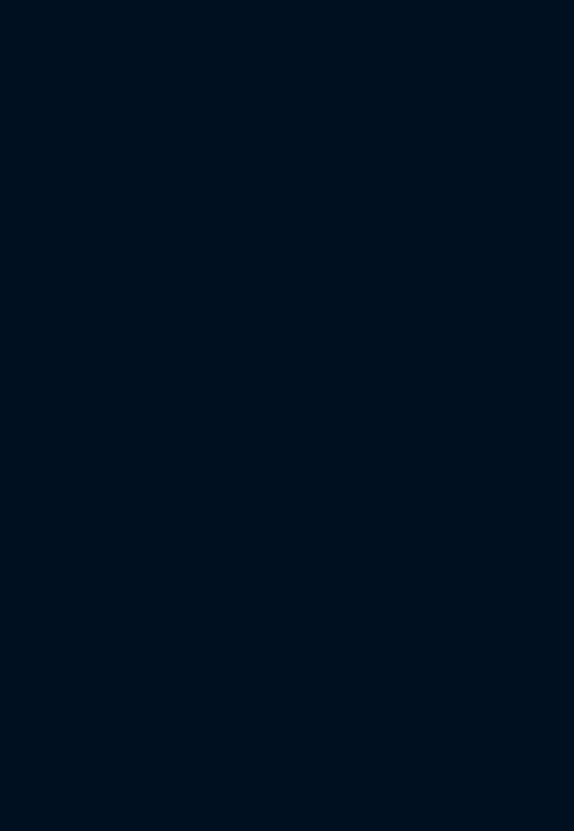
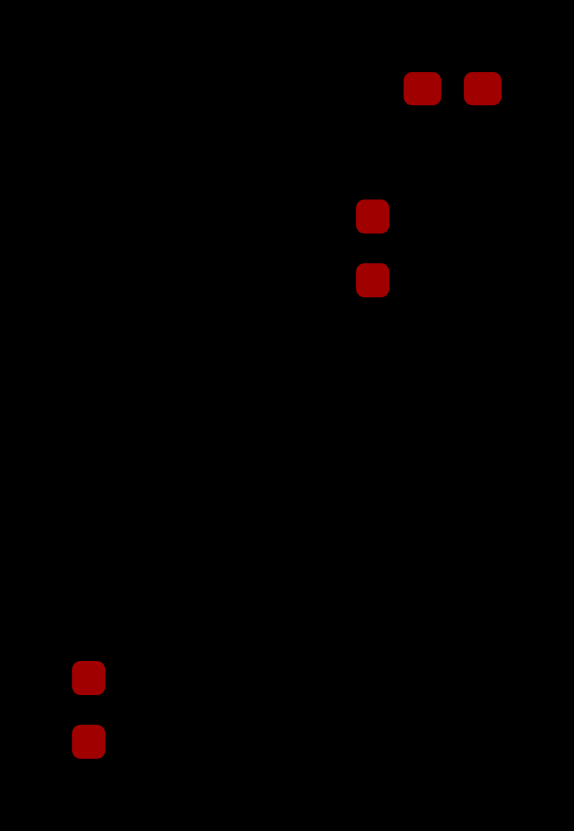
part: none -> (452, 88)
part: none -> (372, 248)
part: none -> (88, 709)

